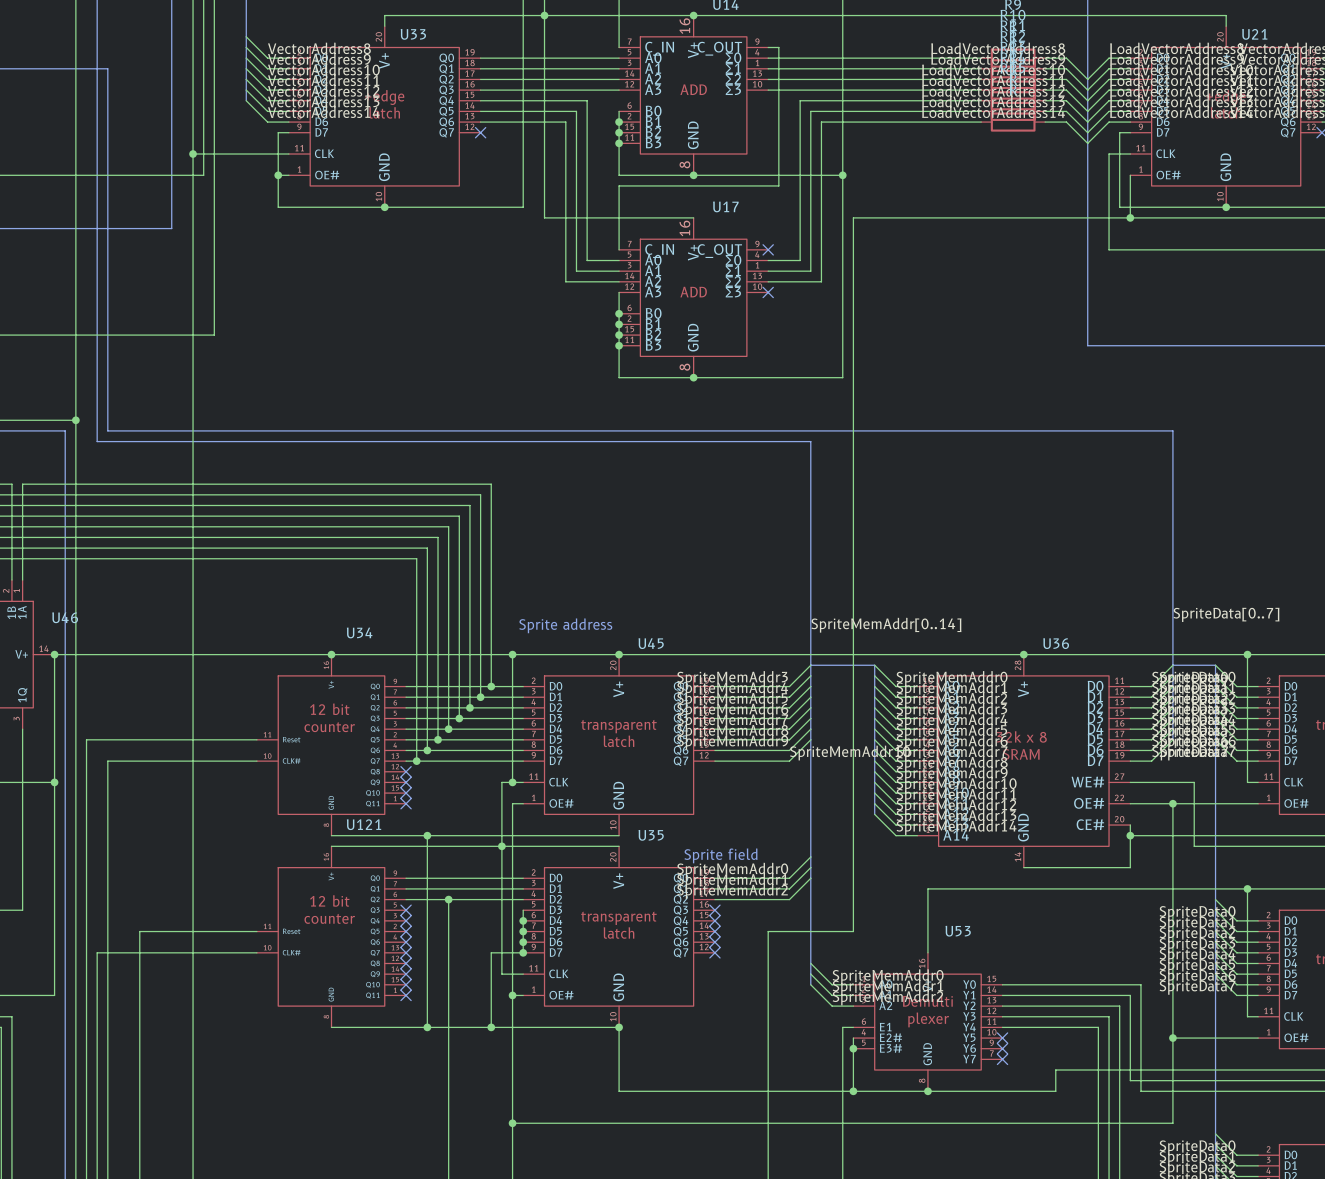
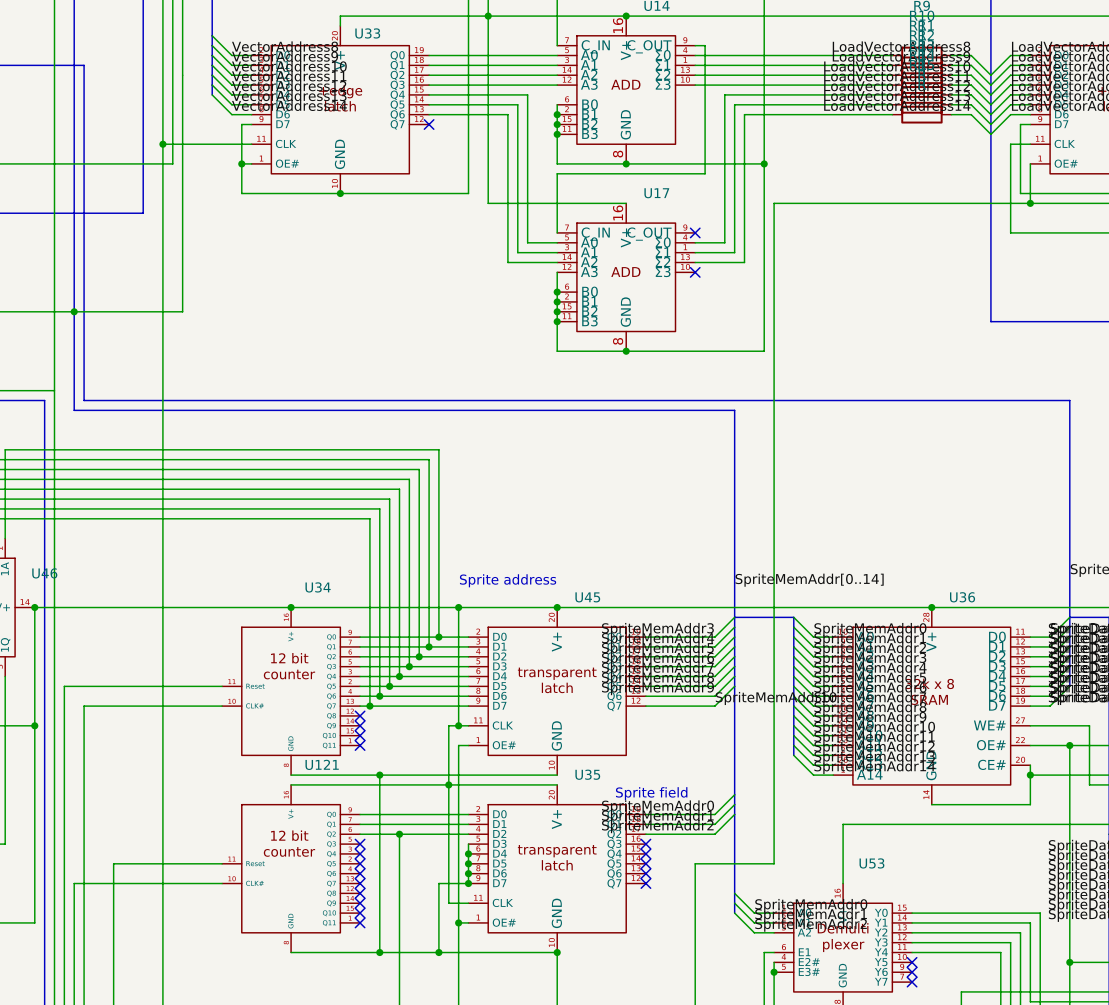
junction: none -> (74, 311)
junction: (75, 420) -> none

